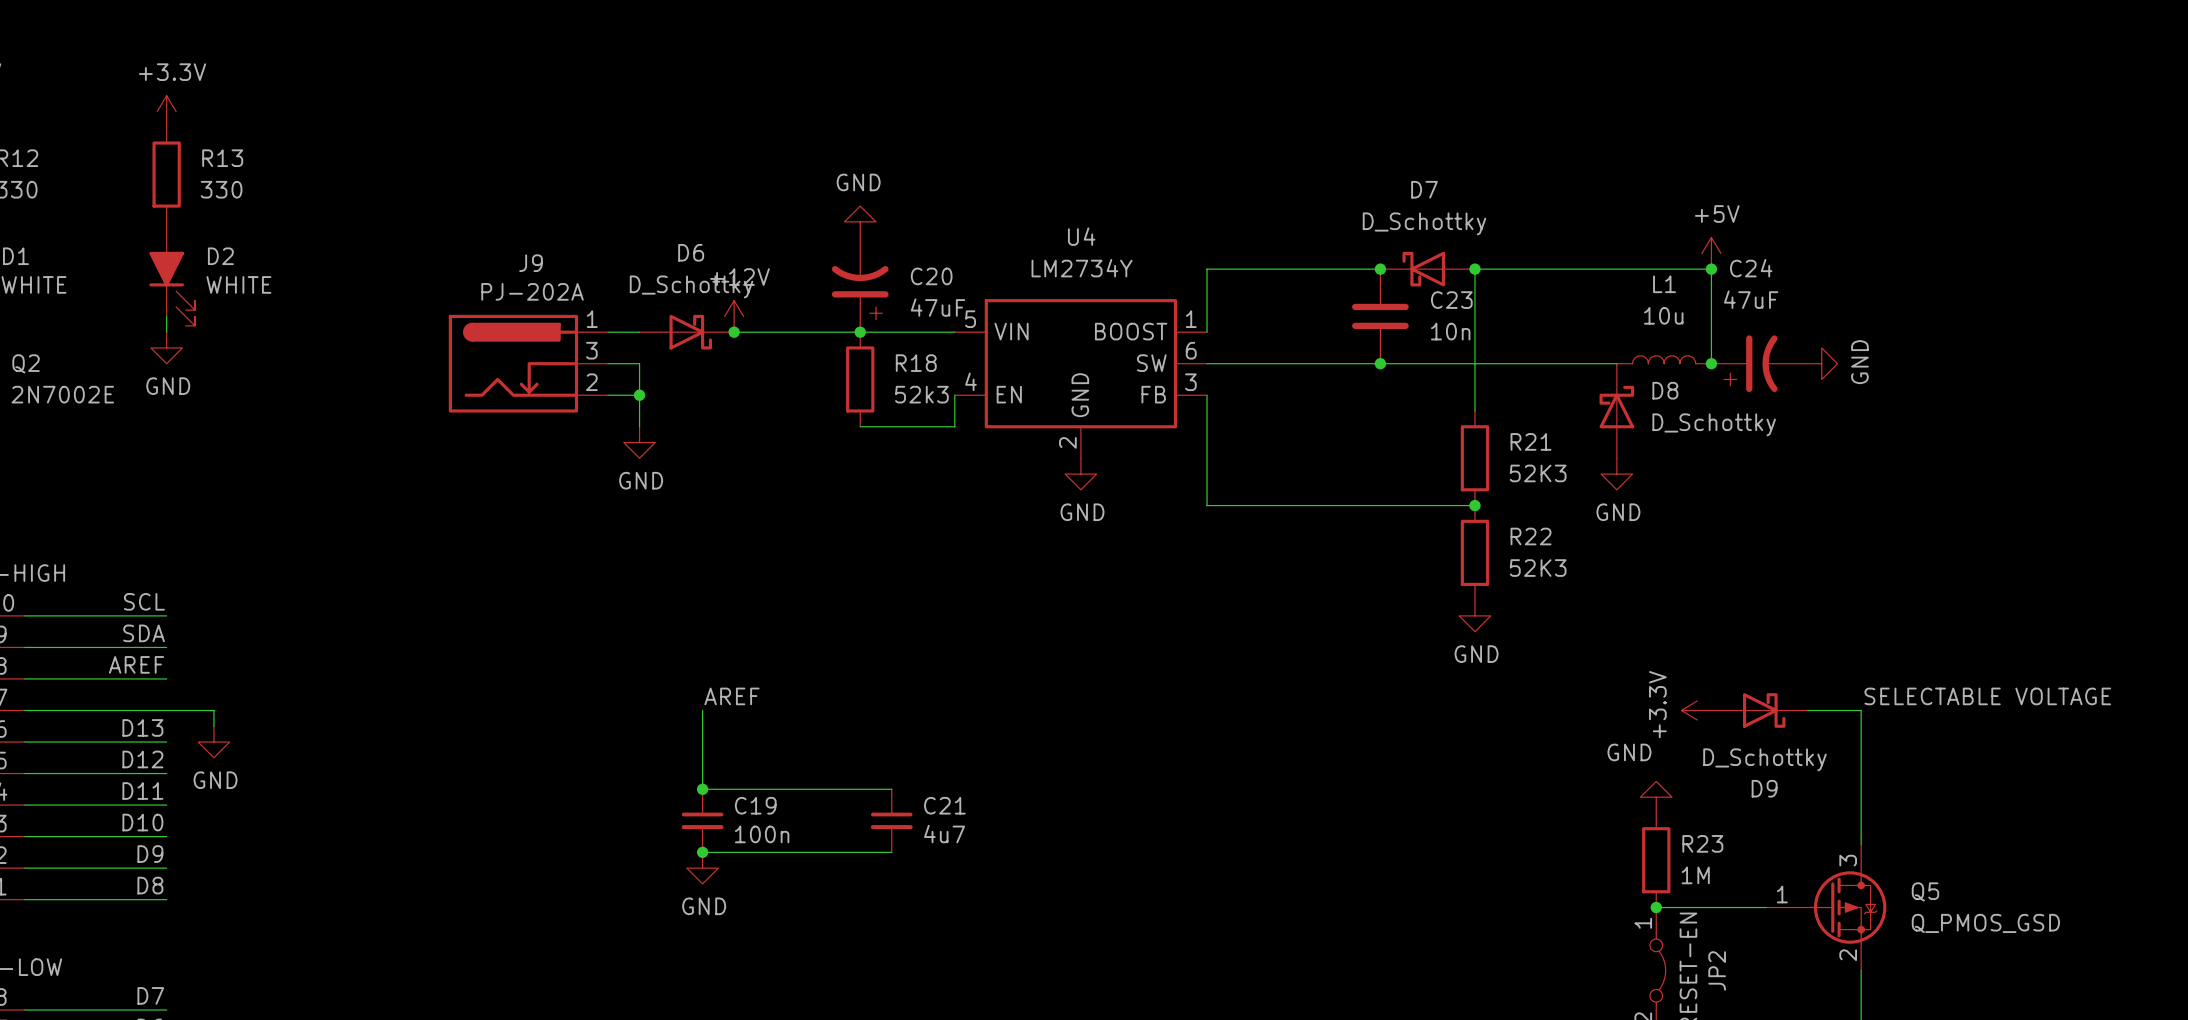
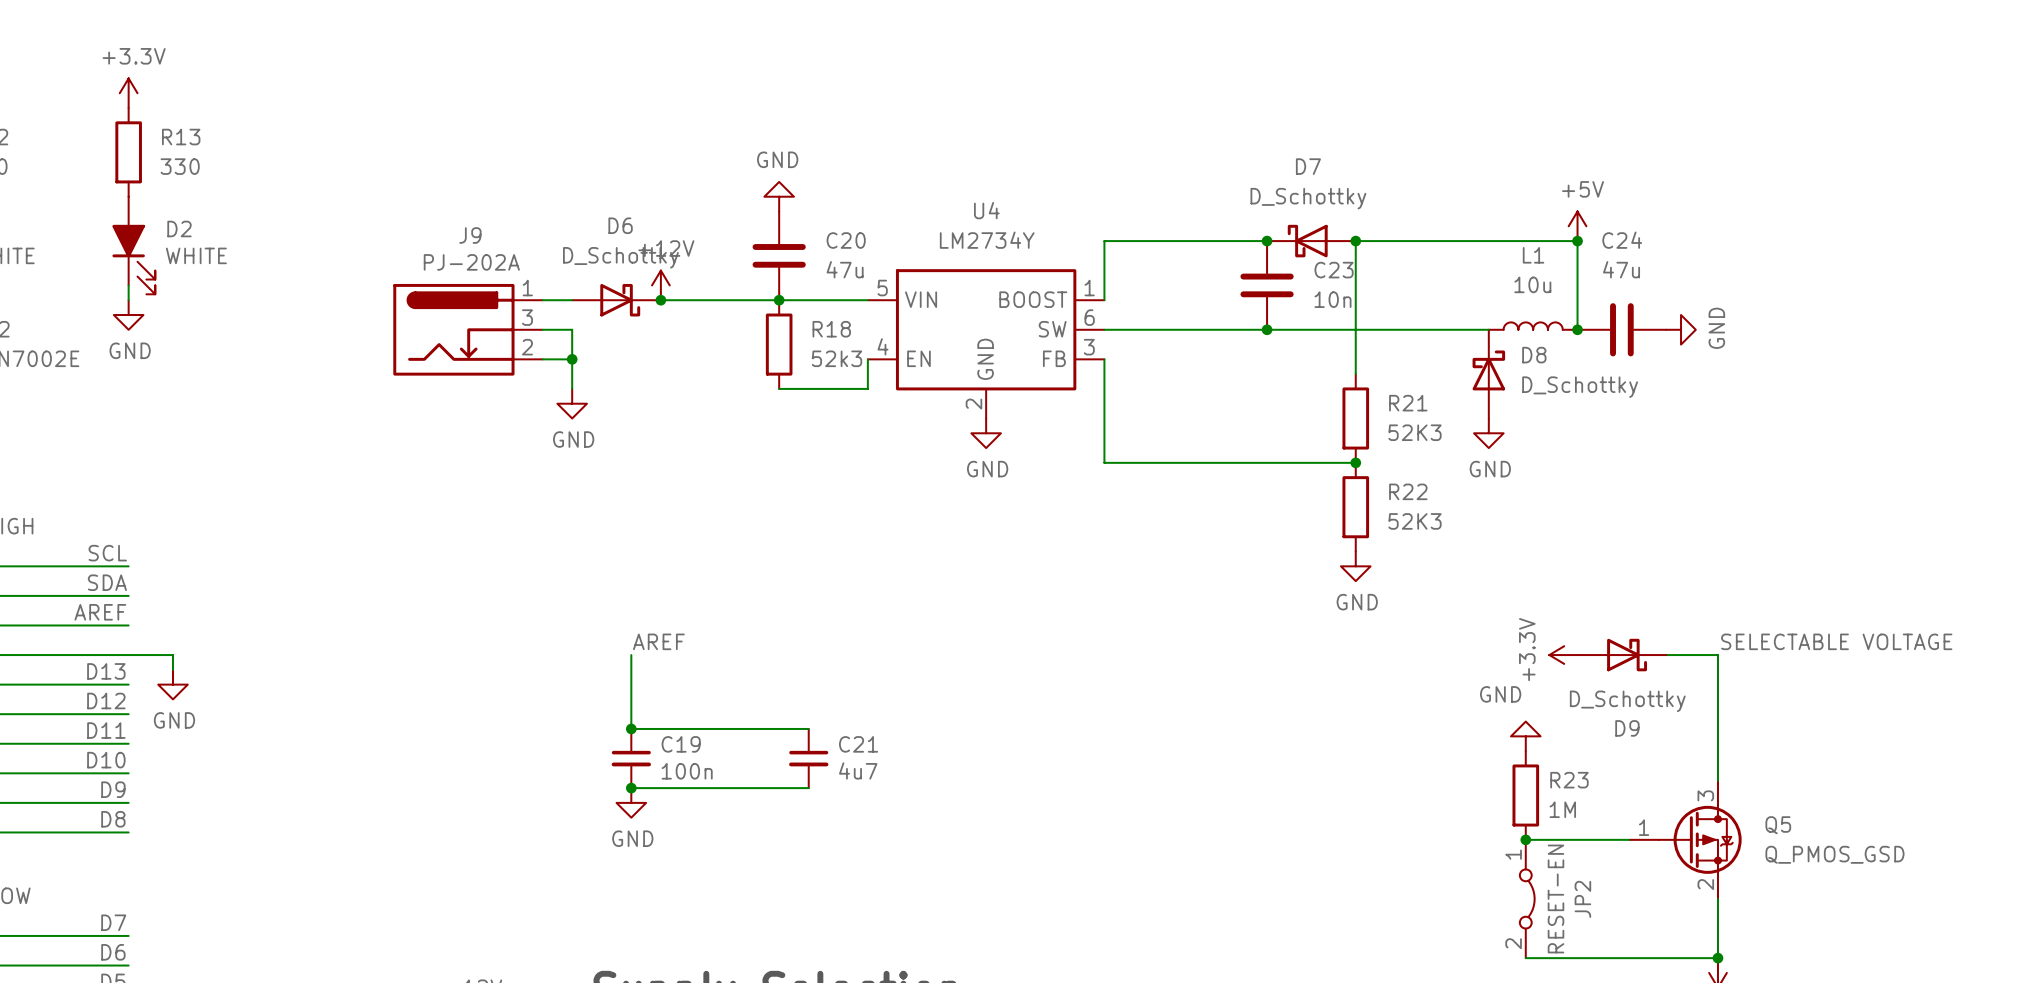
C20 symbol: [831, 237, 889, 333] -> [752, 211, 806, 301]
C24 value: 47uF (1751, 299) -> 47u (1621, 269)
C20 value: 47uF (938, 307) -> 47u (845, 269)
C24 symbol: [1711, 335, 1807, 393] -> [1577, 303, 1667, 357]

